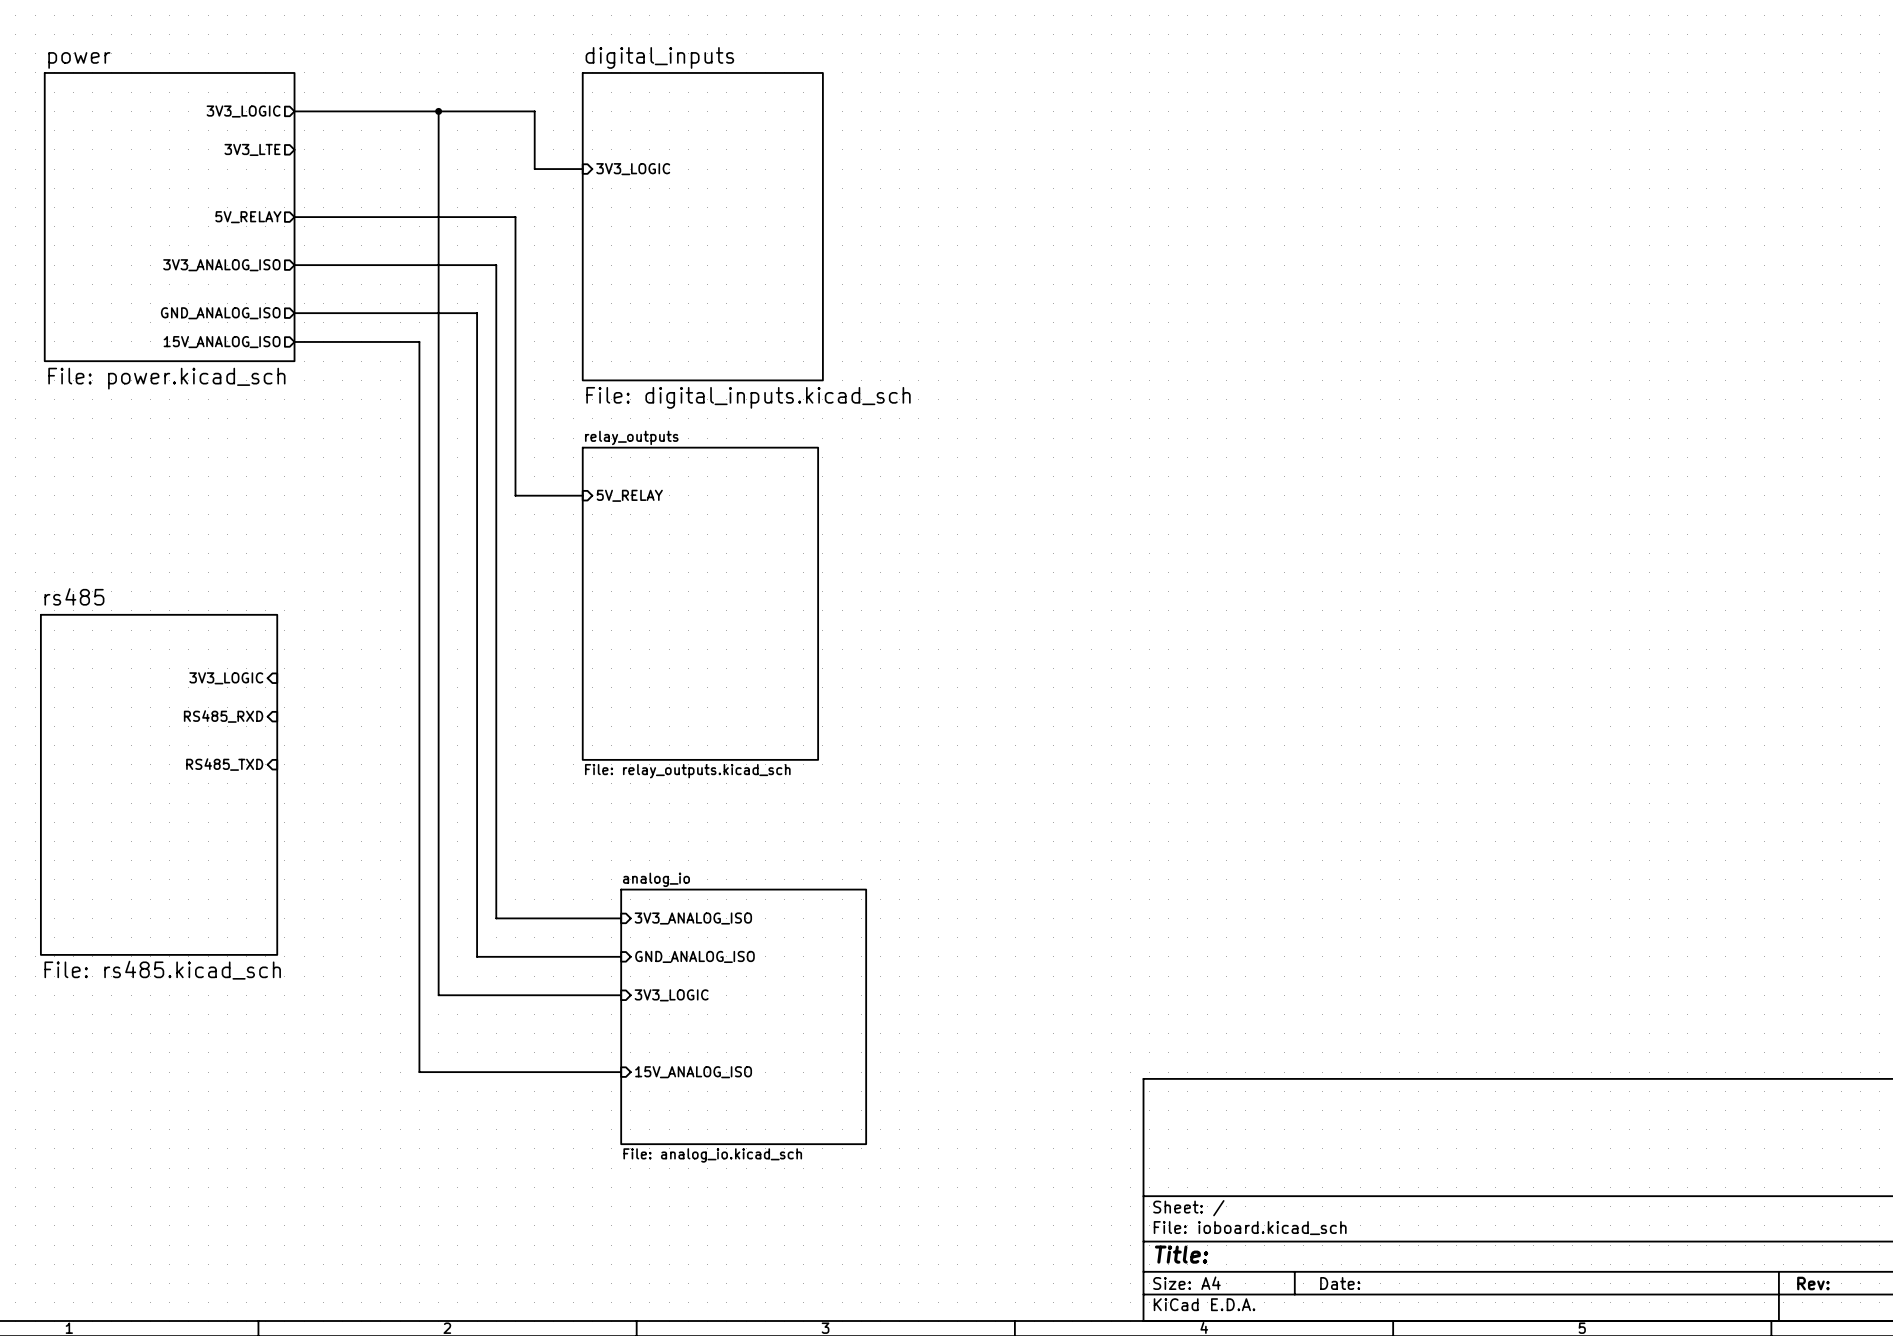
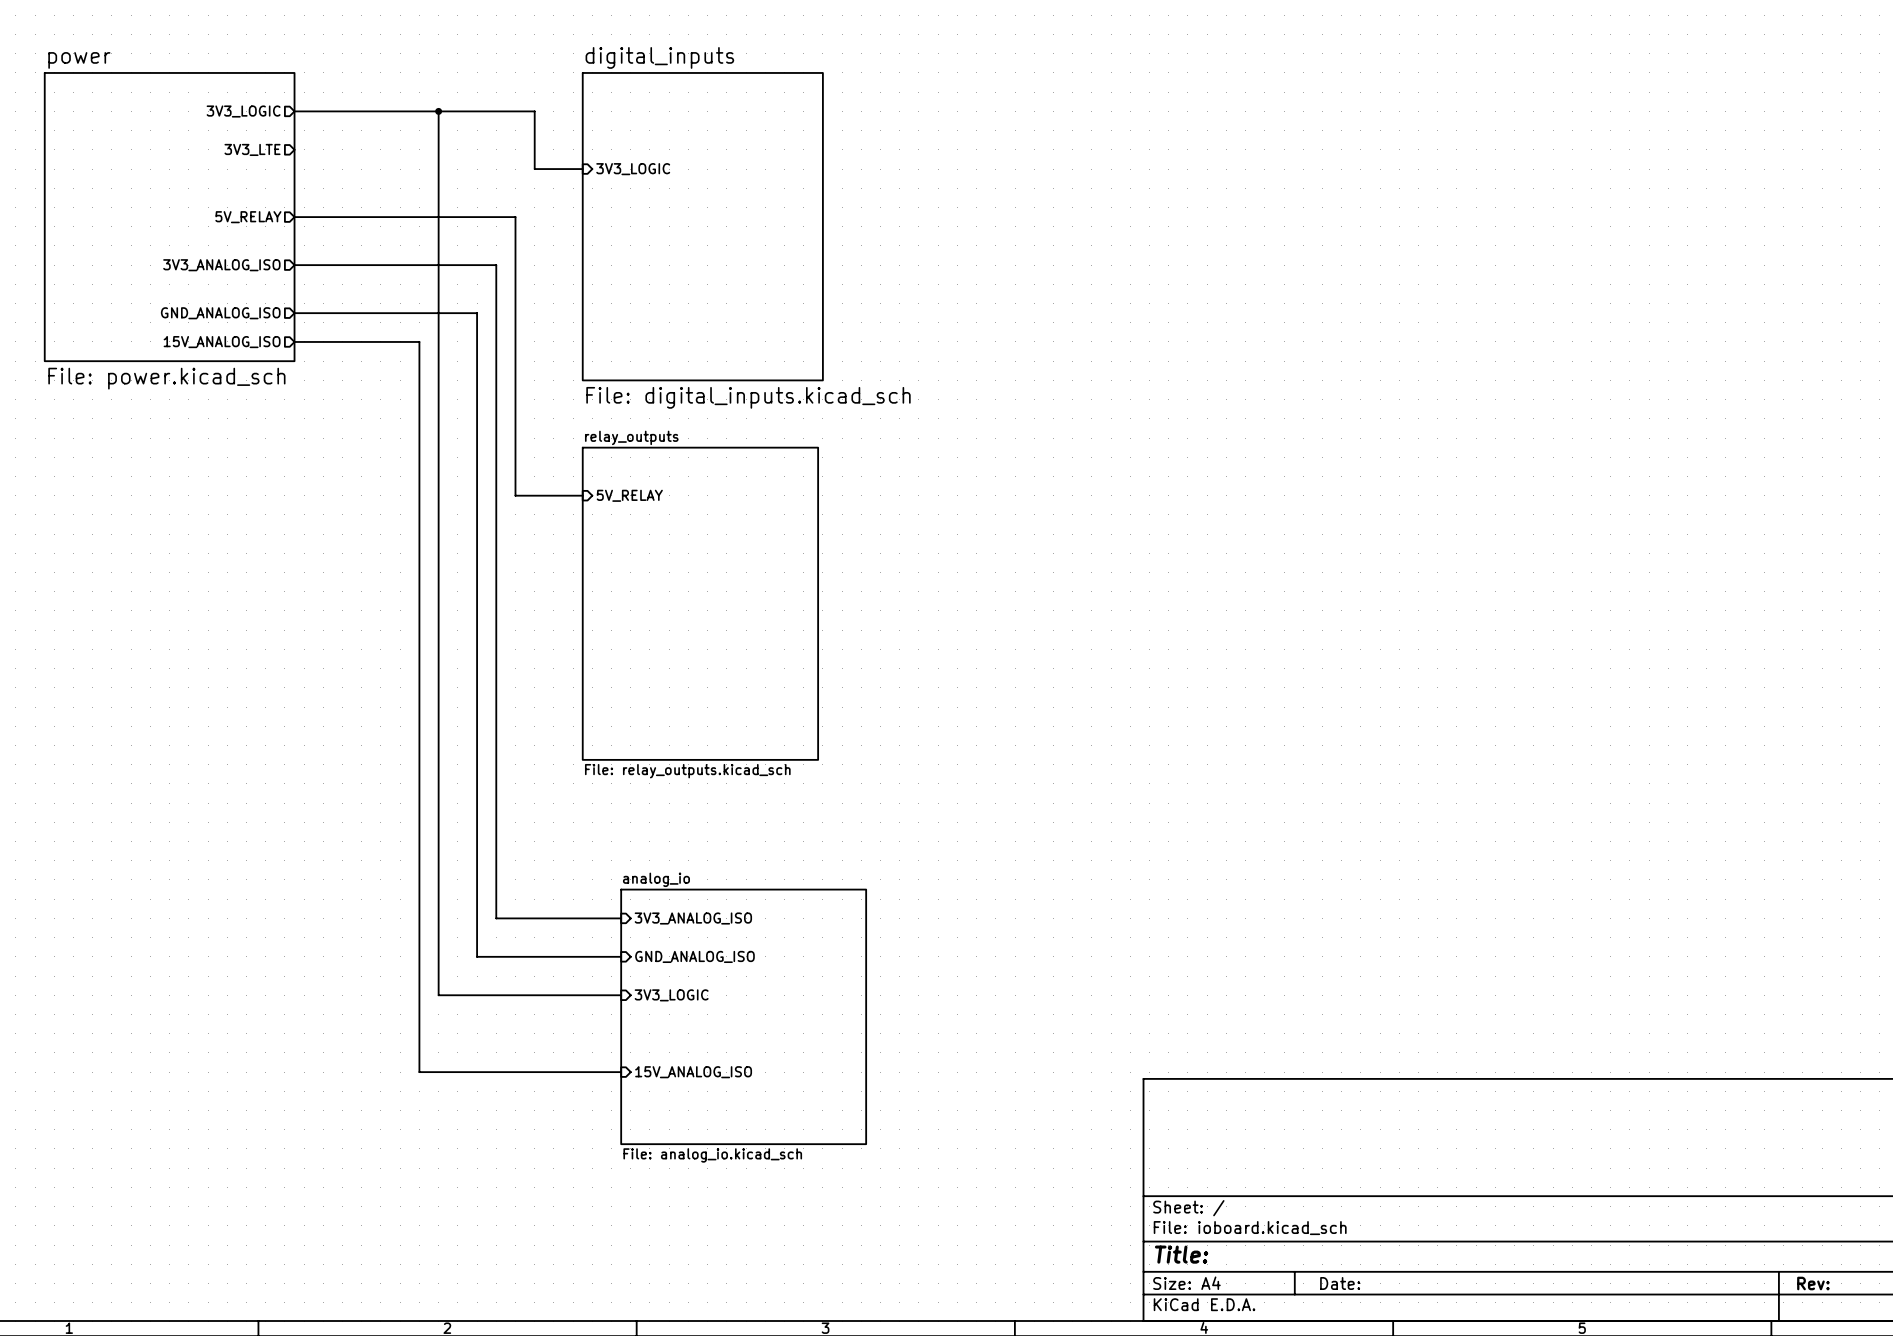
sheet pin: 3V3_LOGIC (226, 678) -> none
sheet pin: RS485_RXD (223, 716) -> none
sheet pin: RS485_TXD (224, 764) -> none
sheet rs485: File: rs485.kicad_sch (159, 784) -> none

